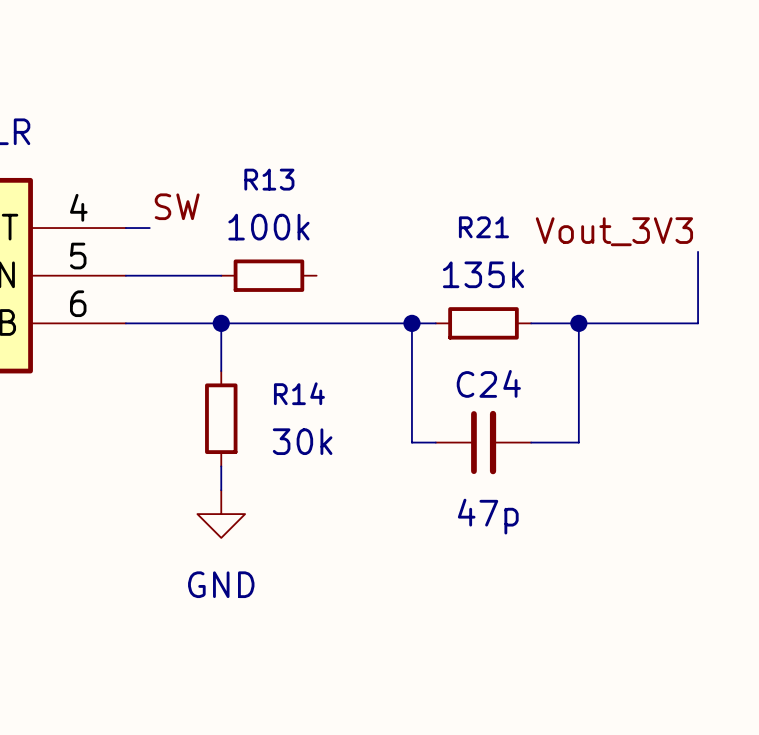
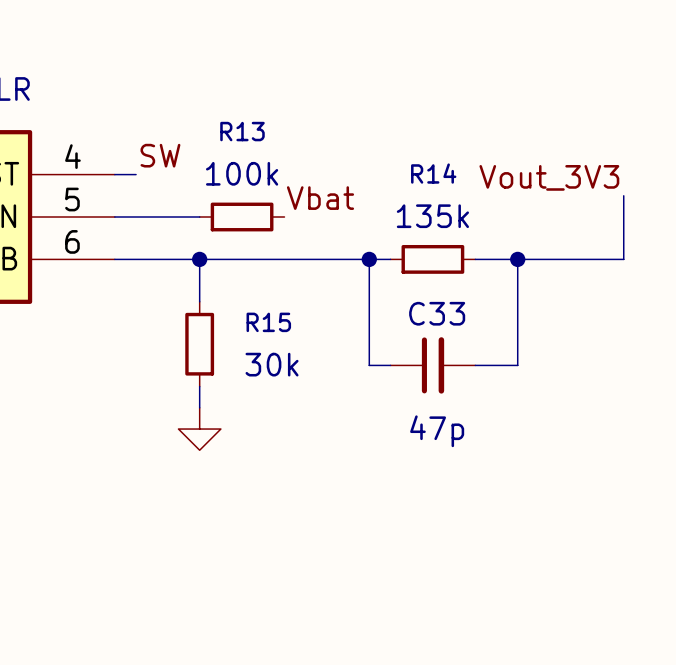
R21 name: R21 (483, 227) -> R14 (433, 173)
label: none -> Vbat (320, 198)
C24 name: C24 (488, 383) -> C33 (437, 313)
R14 name: R14 (299, 393) -> R15 (268, 322)
power symbol text: GND (221, 584) -> none

